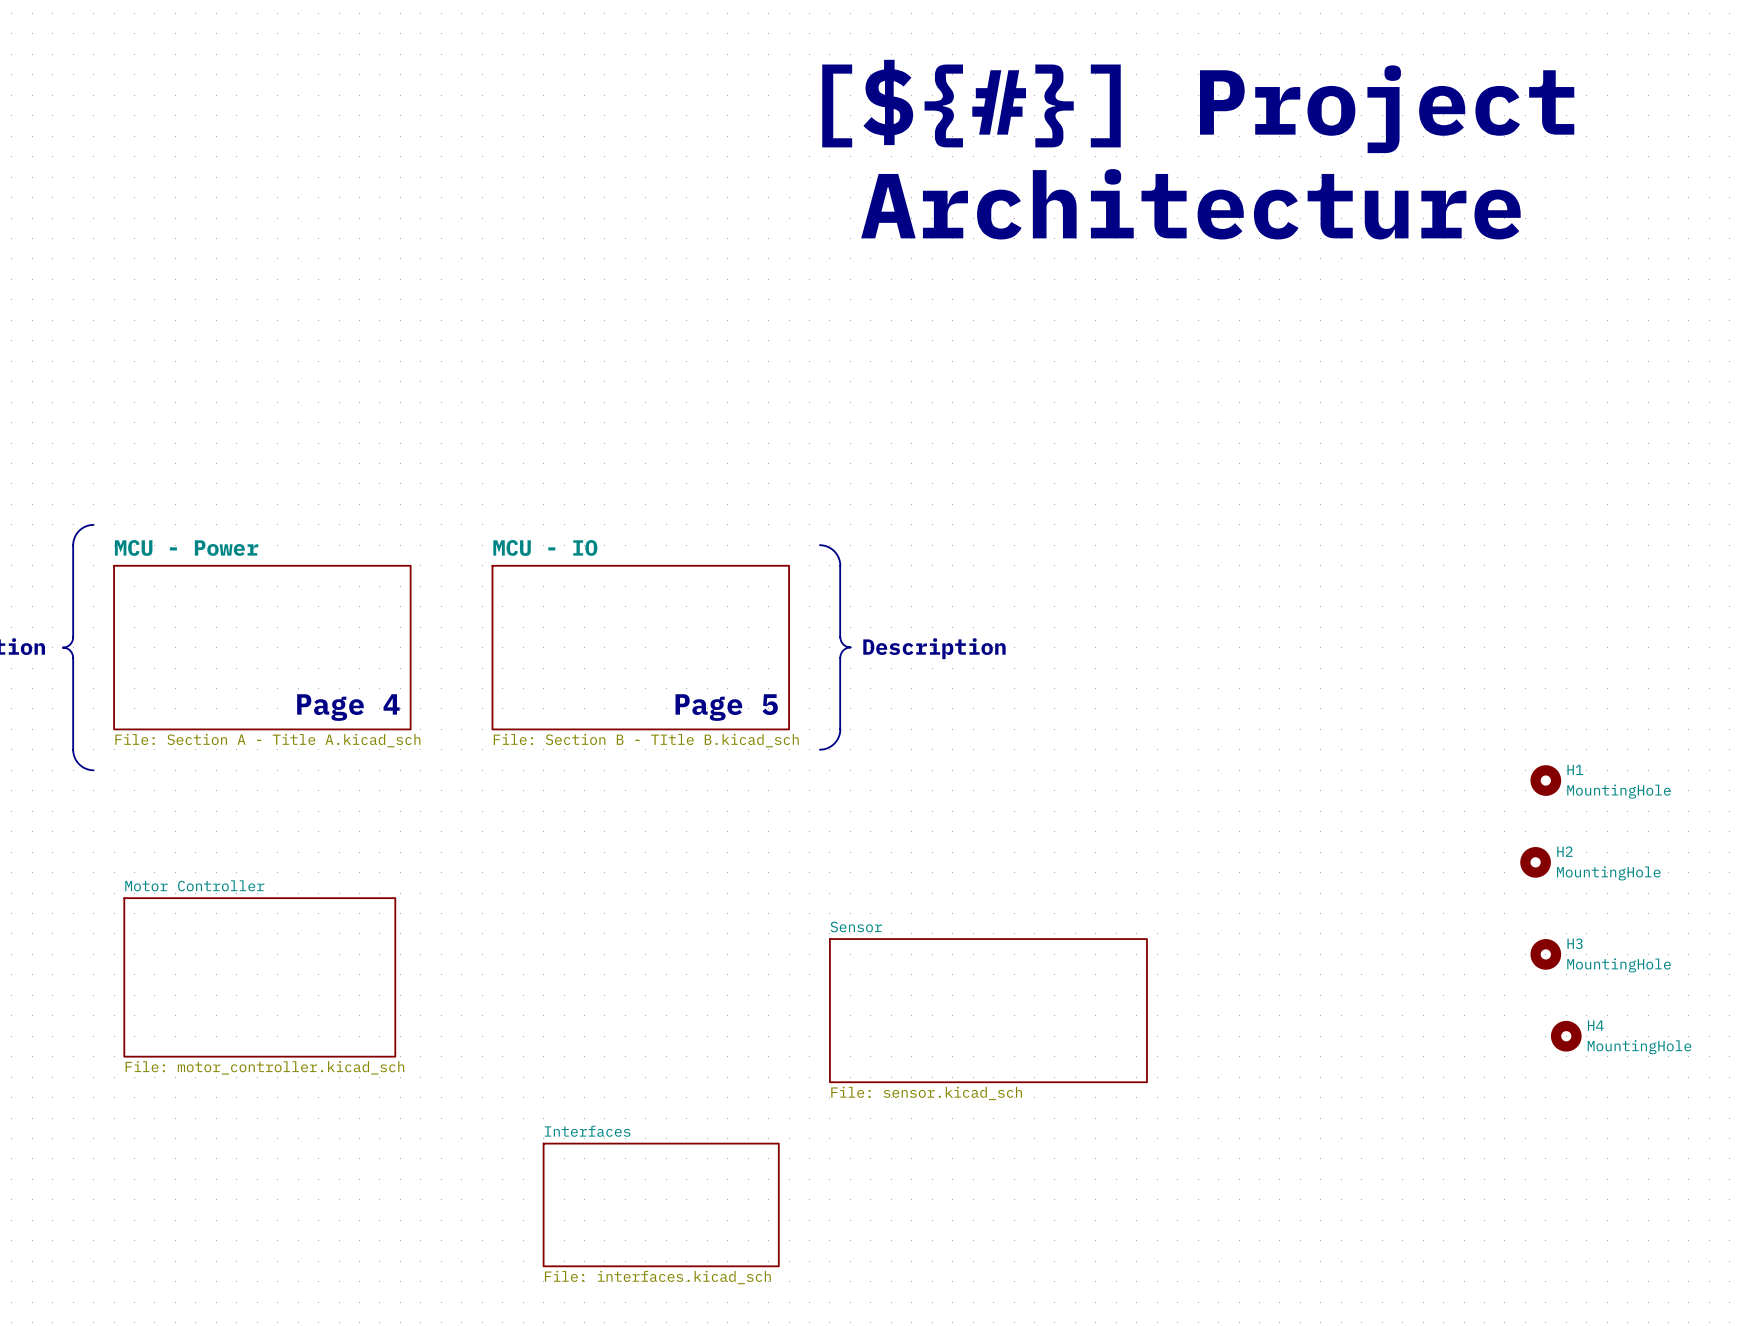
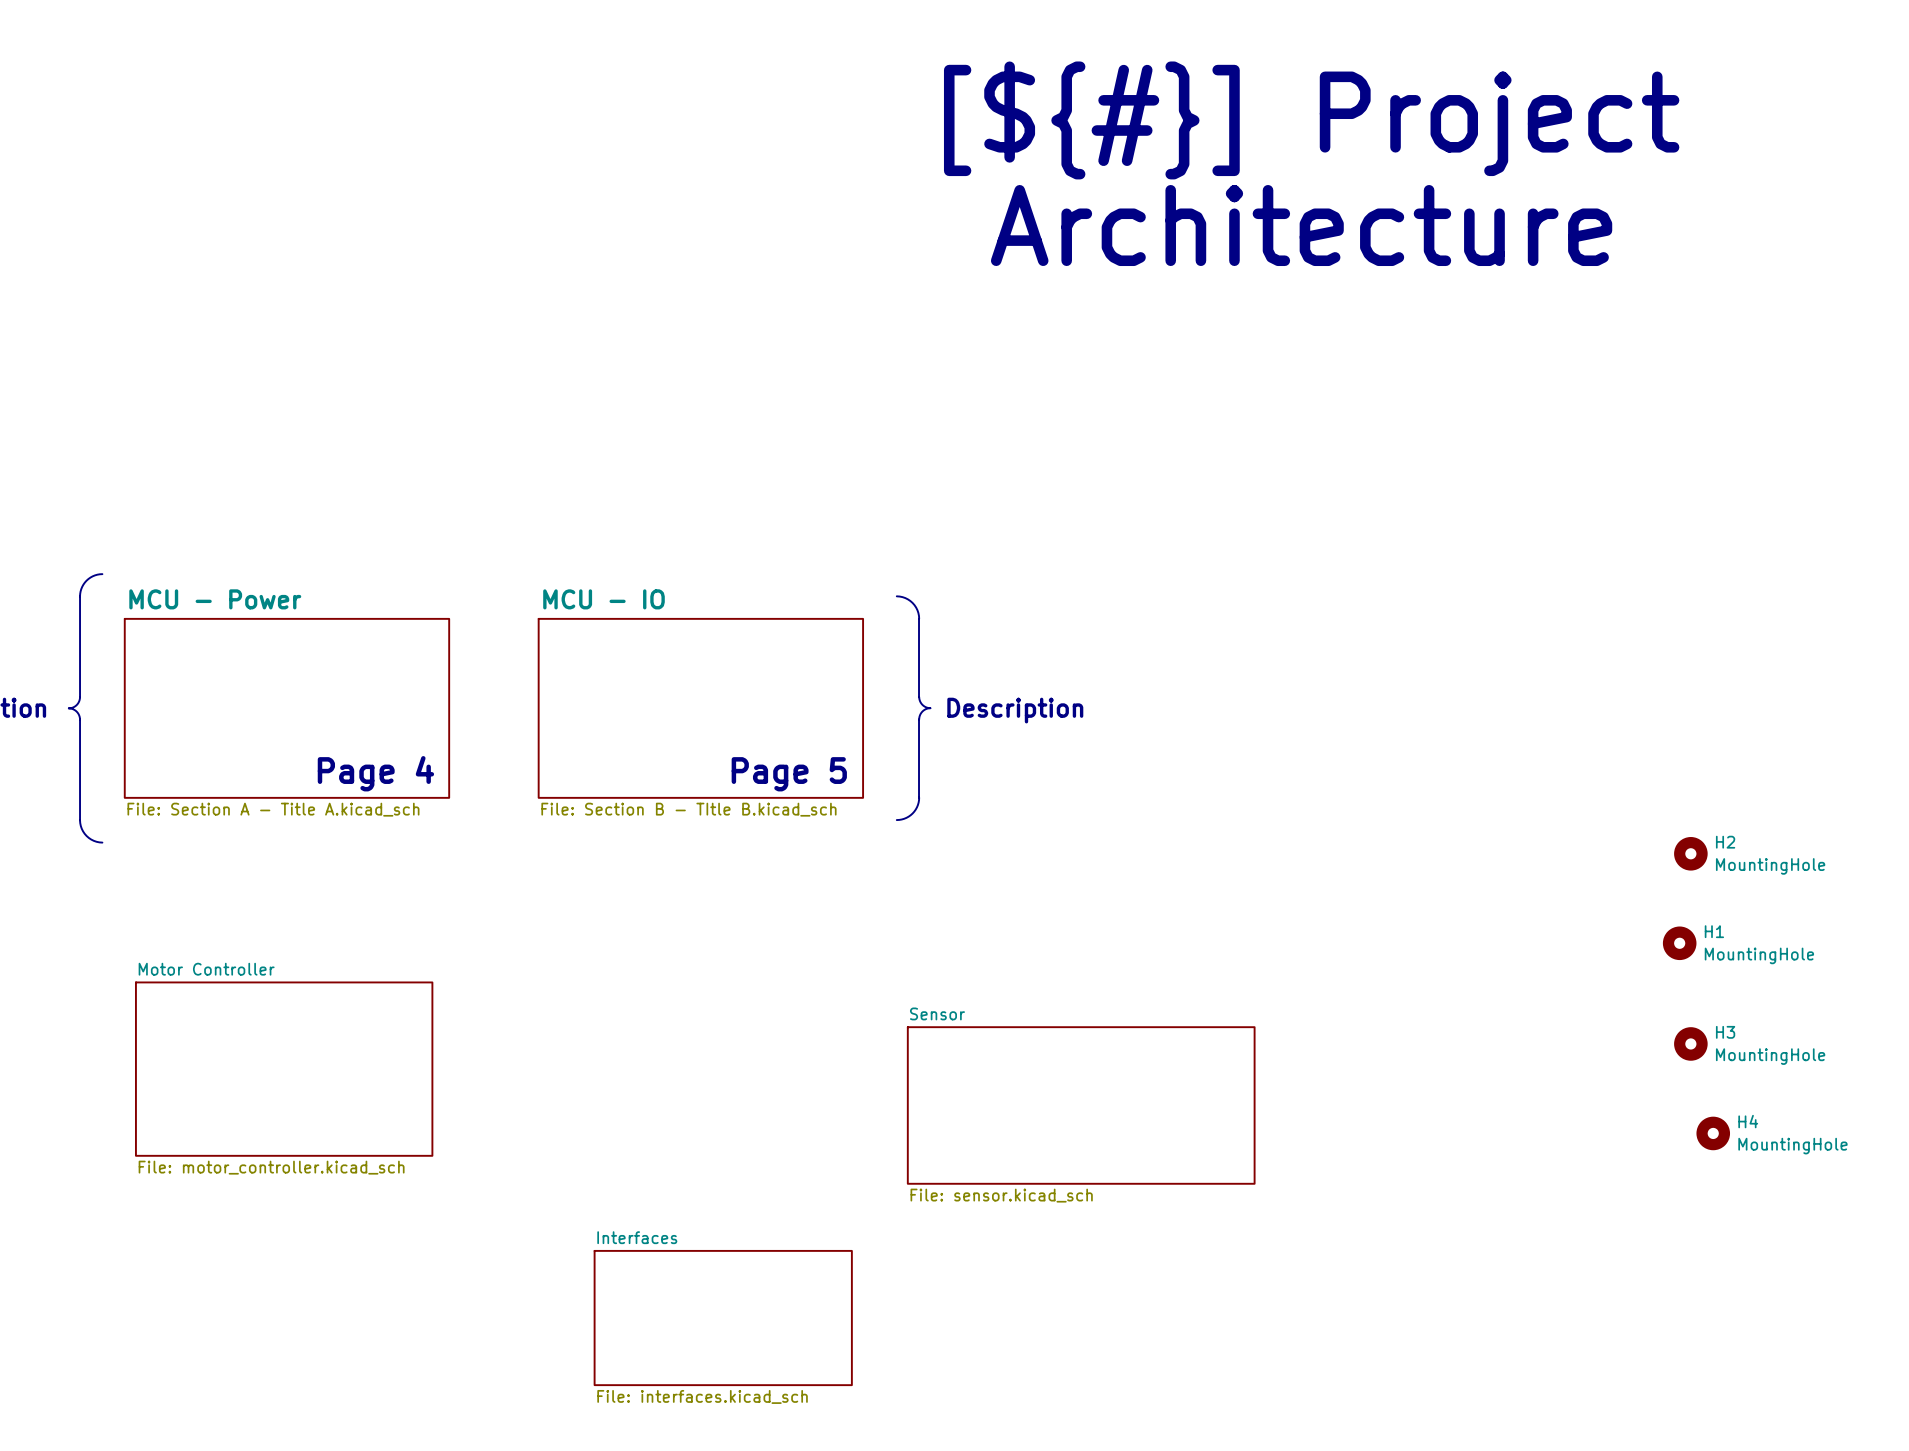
H1 name: H1 (1575, 769) -> H2 (1725, 842)
H2 name: H2 (1564, 851) -> H1 (1714, 931)

